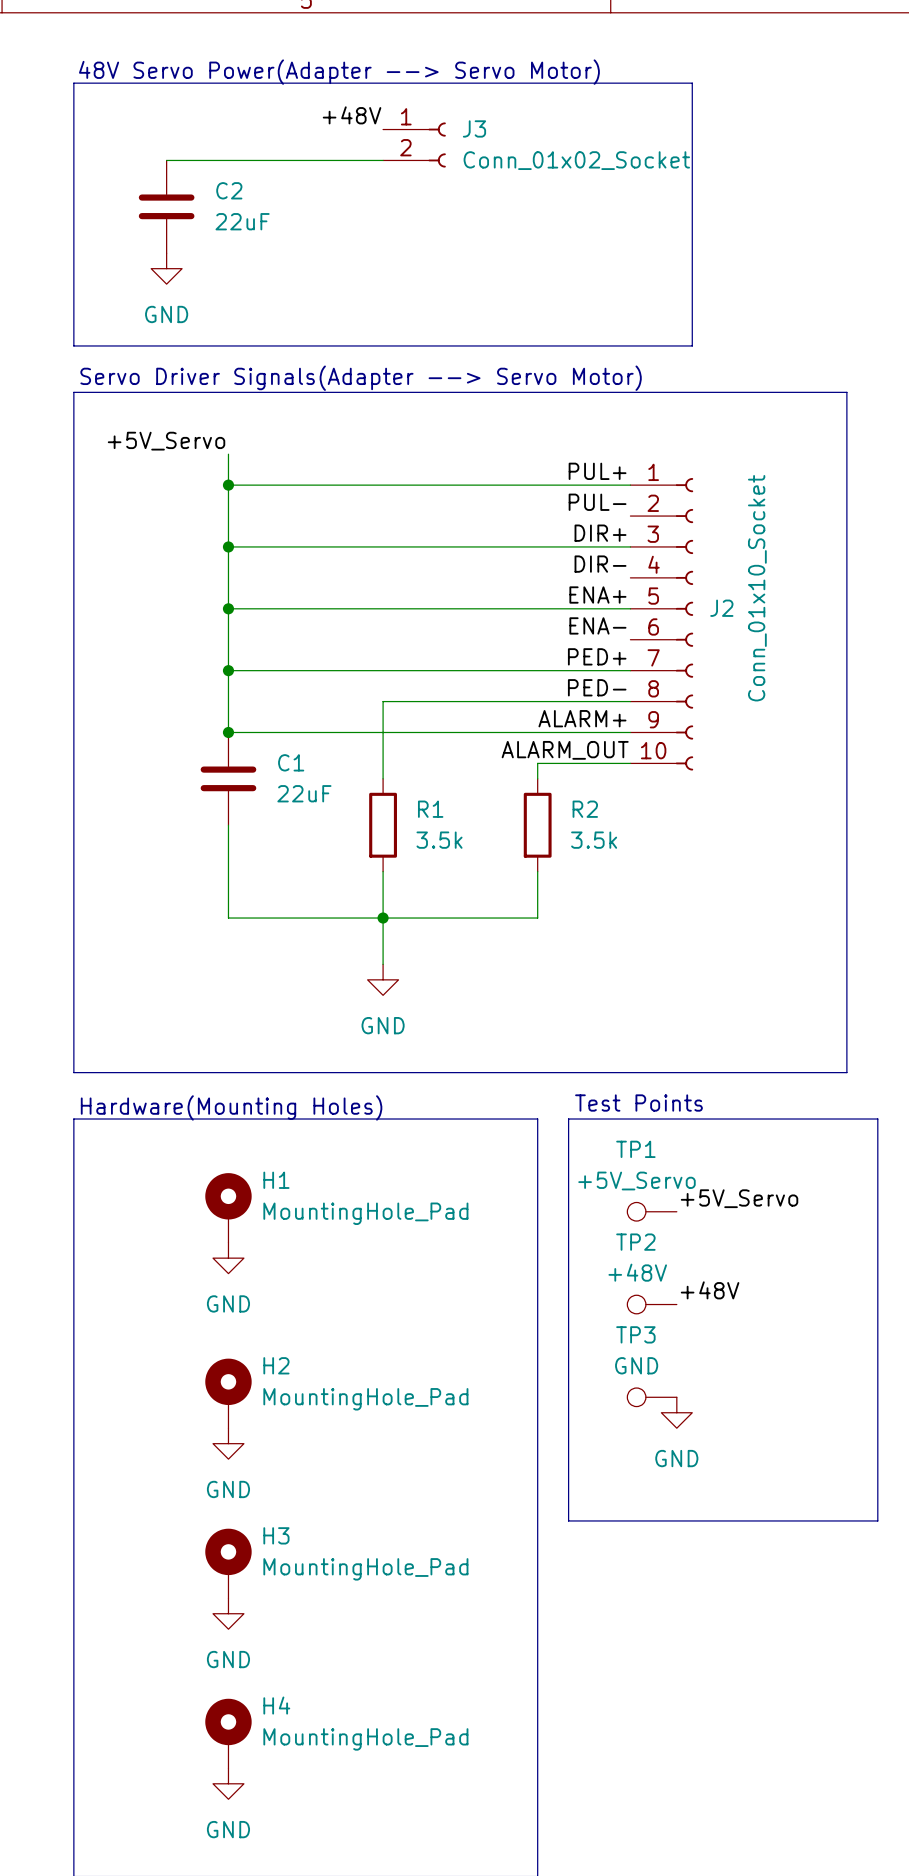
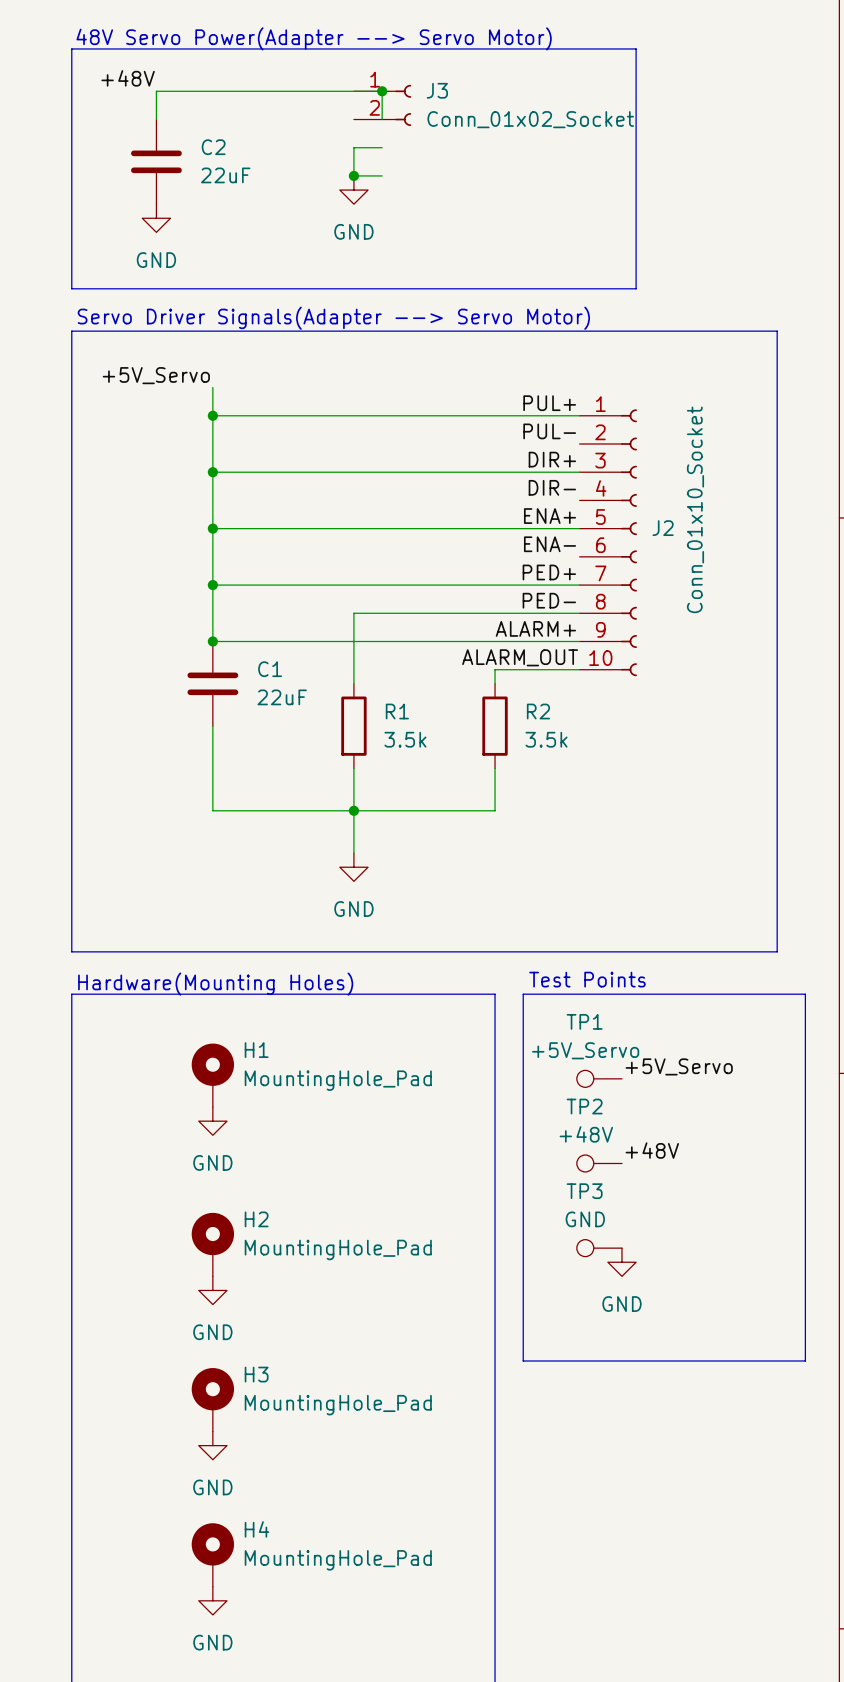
label position: +48V (352, 115) -> +48V (128, 78)
junction: none -> (382, 91)
wire: (166, 160) (383, 160) -> (156, 119) (156, 91) (382, 91) (382, 119)
wire: none -> (382, 147) (353, 147) (353, 175) (382, 175)
junction: none -> (353, 175)
power symbol: none -> GND (353, 190)

